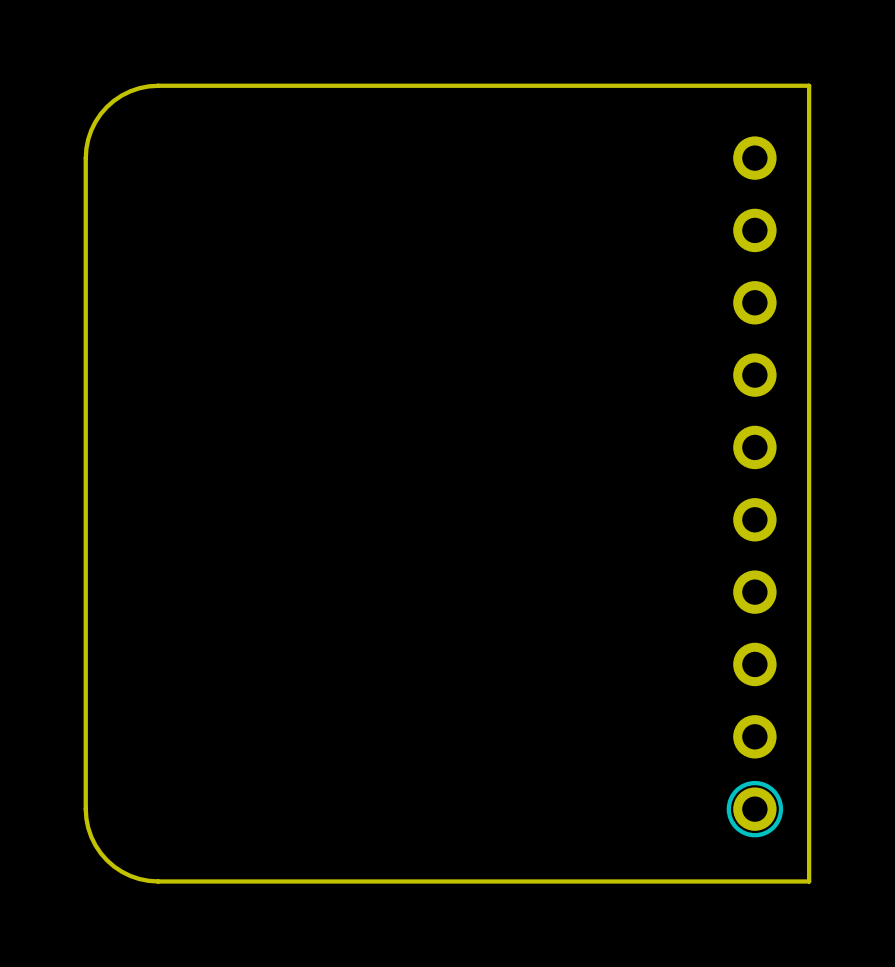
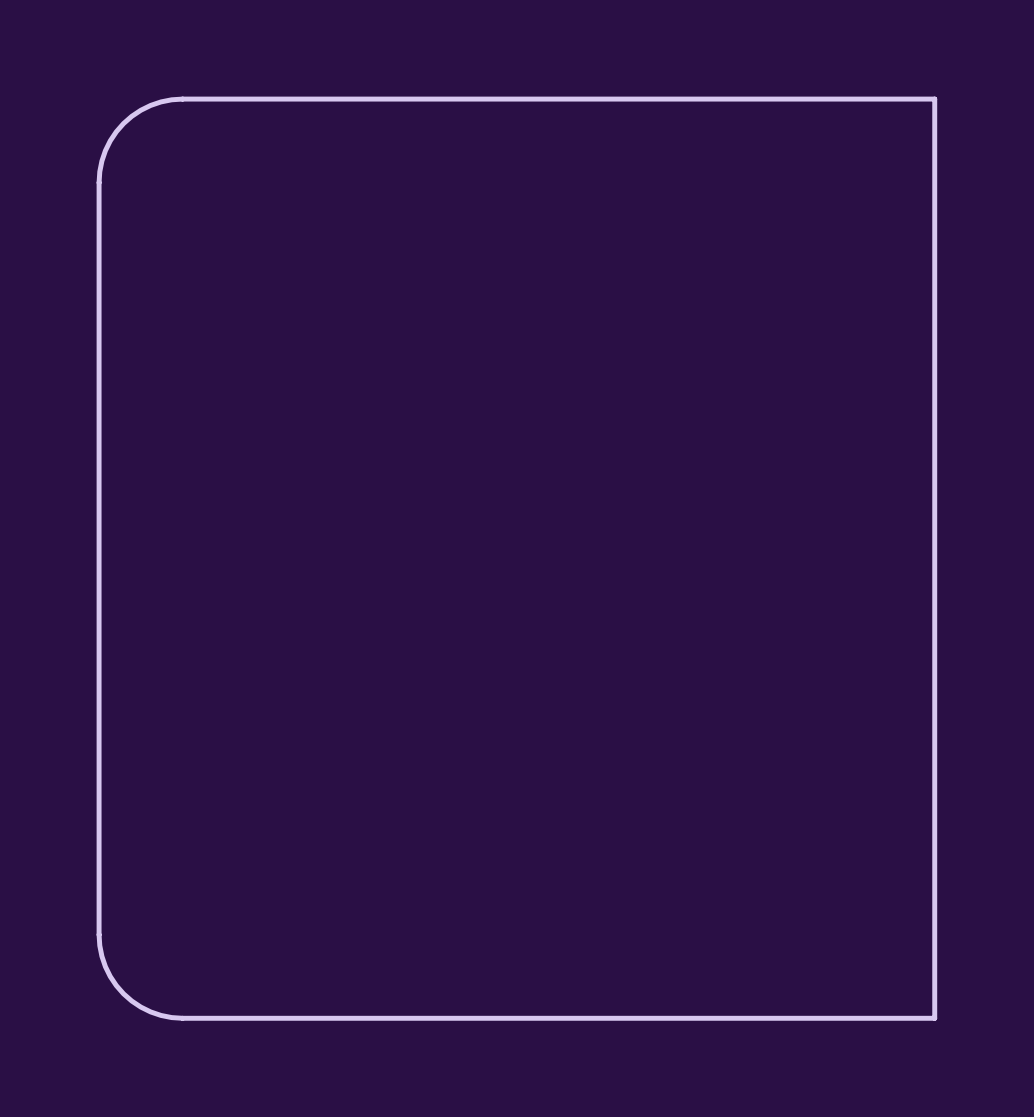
part: (754, 486) -> none

